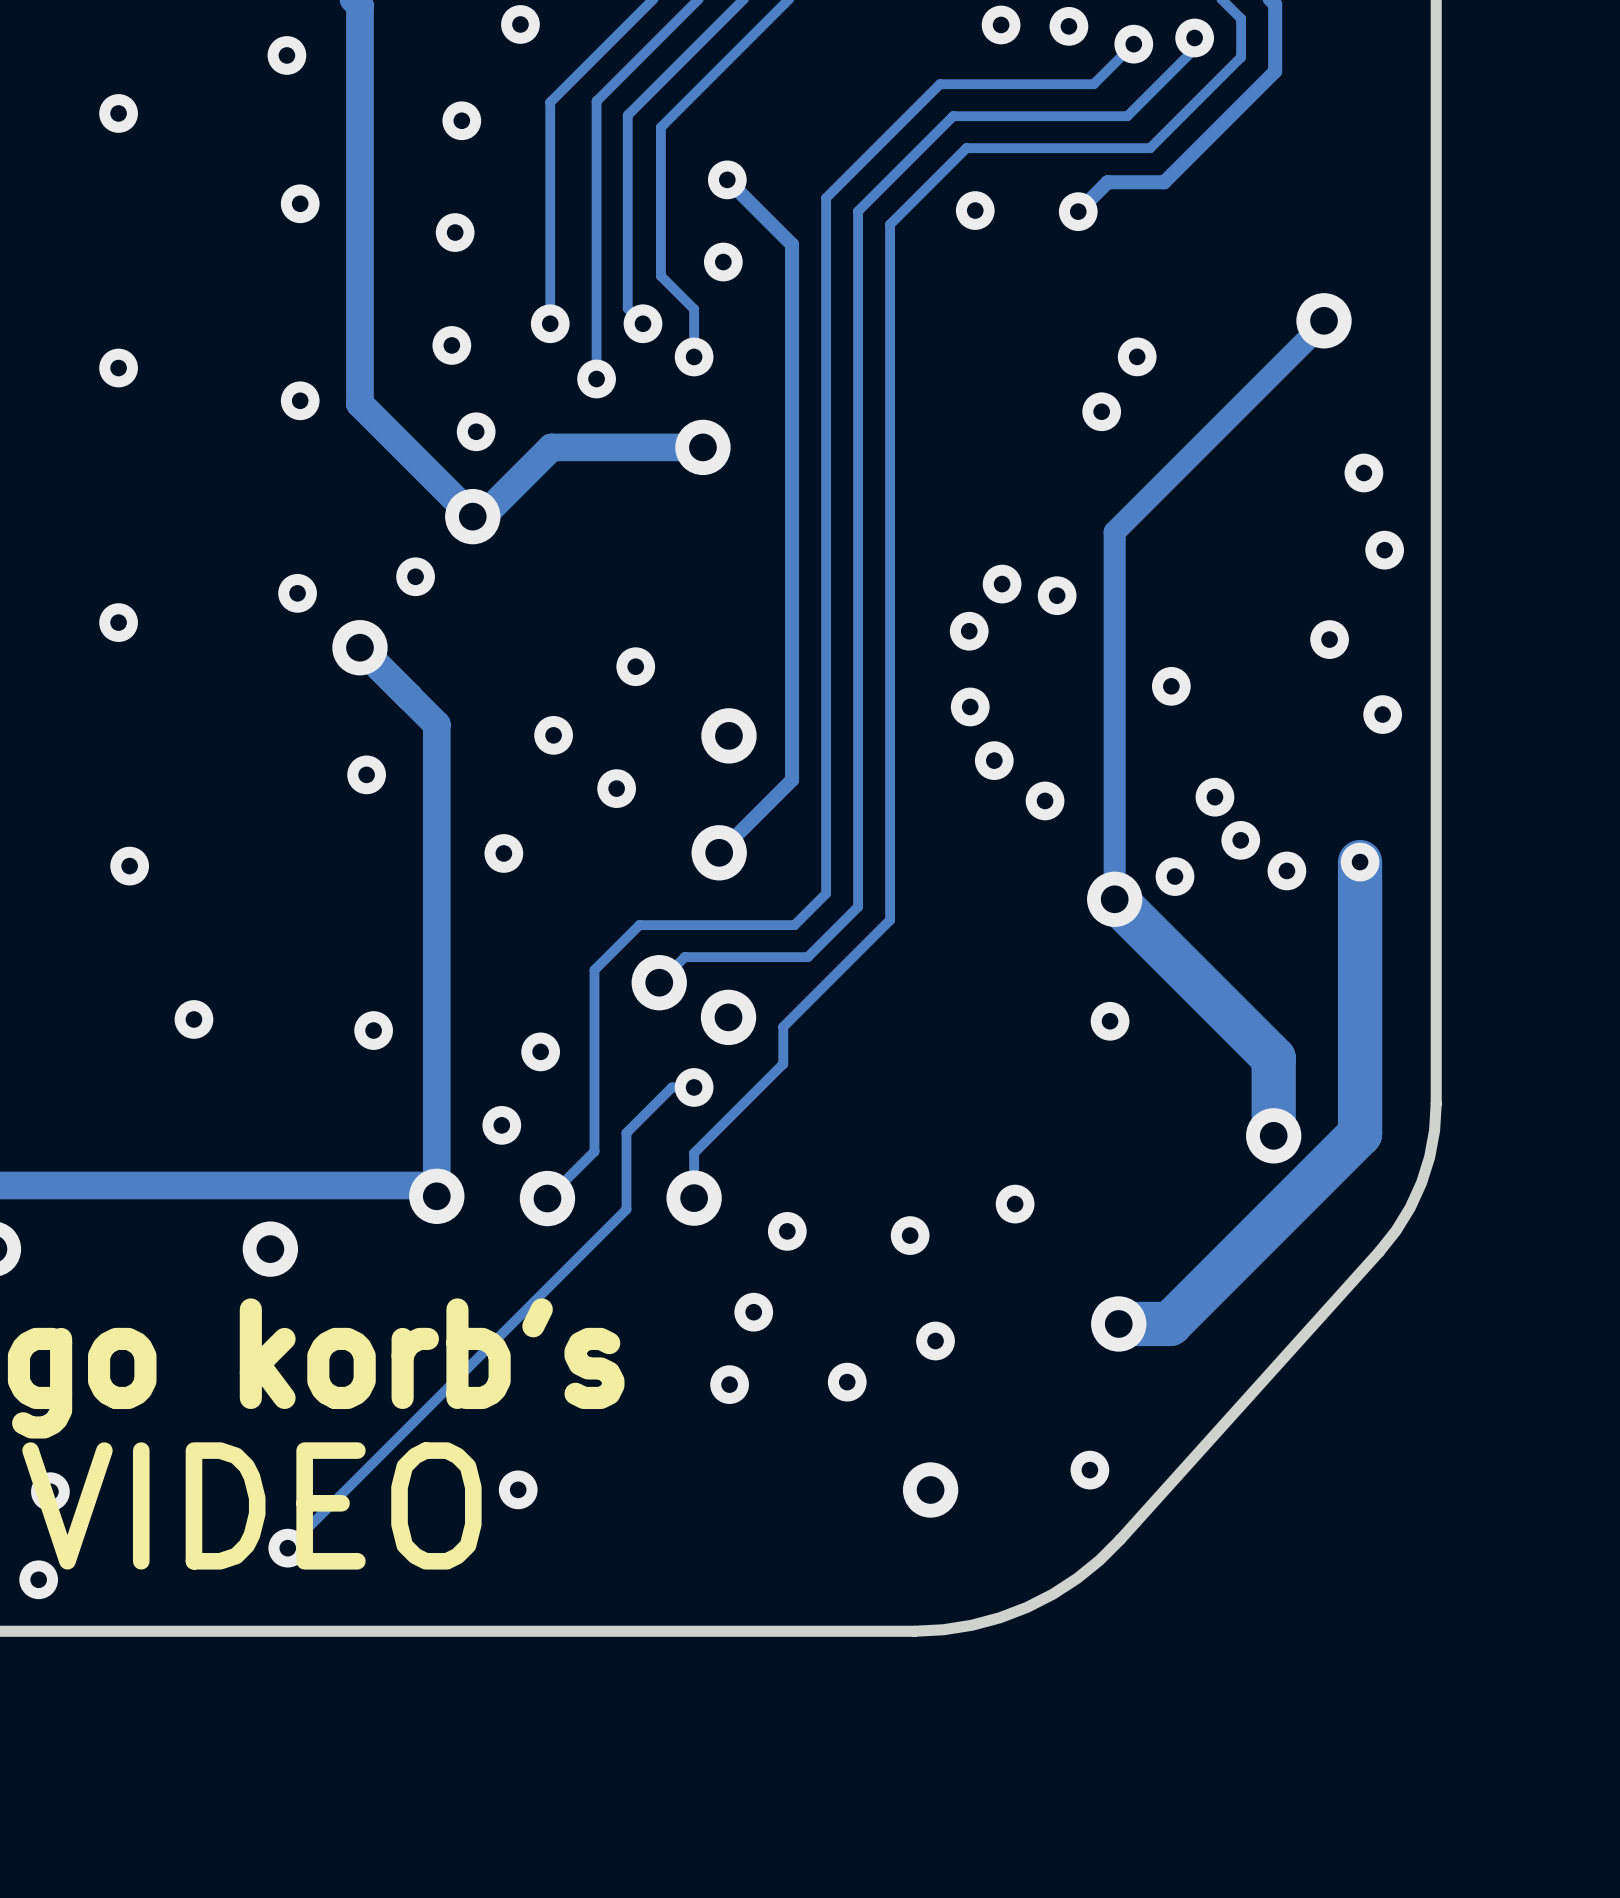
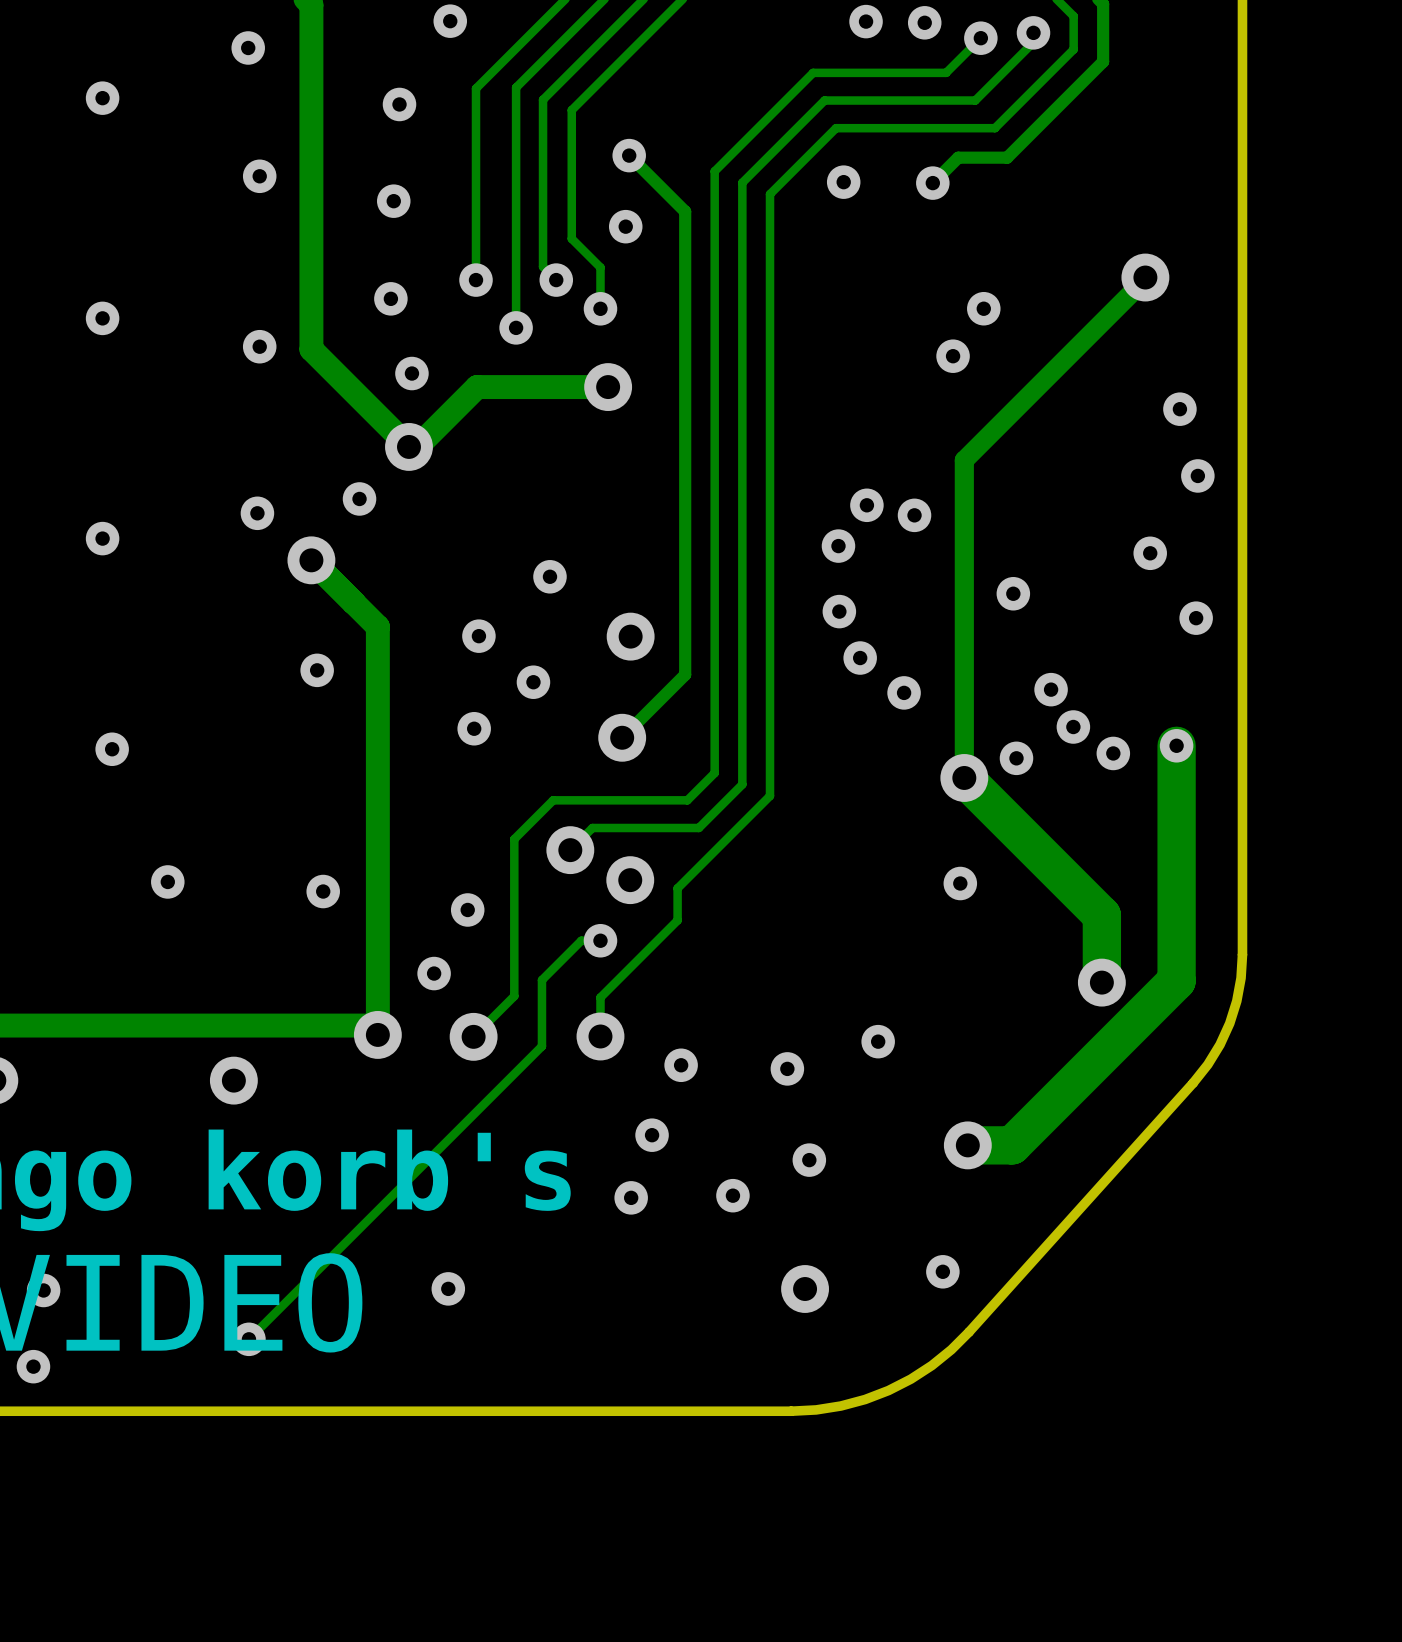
via position: (503, 853) -> (474, 728)

